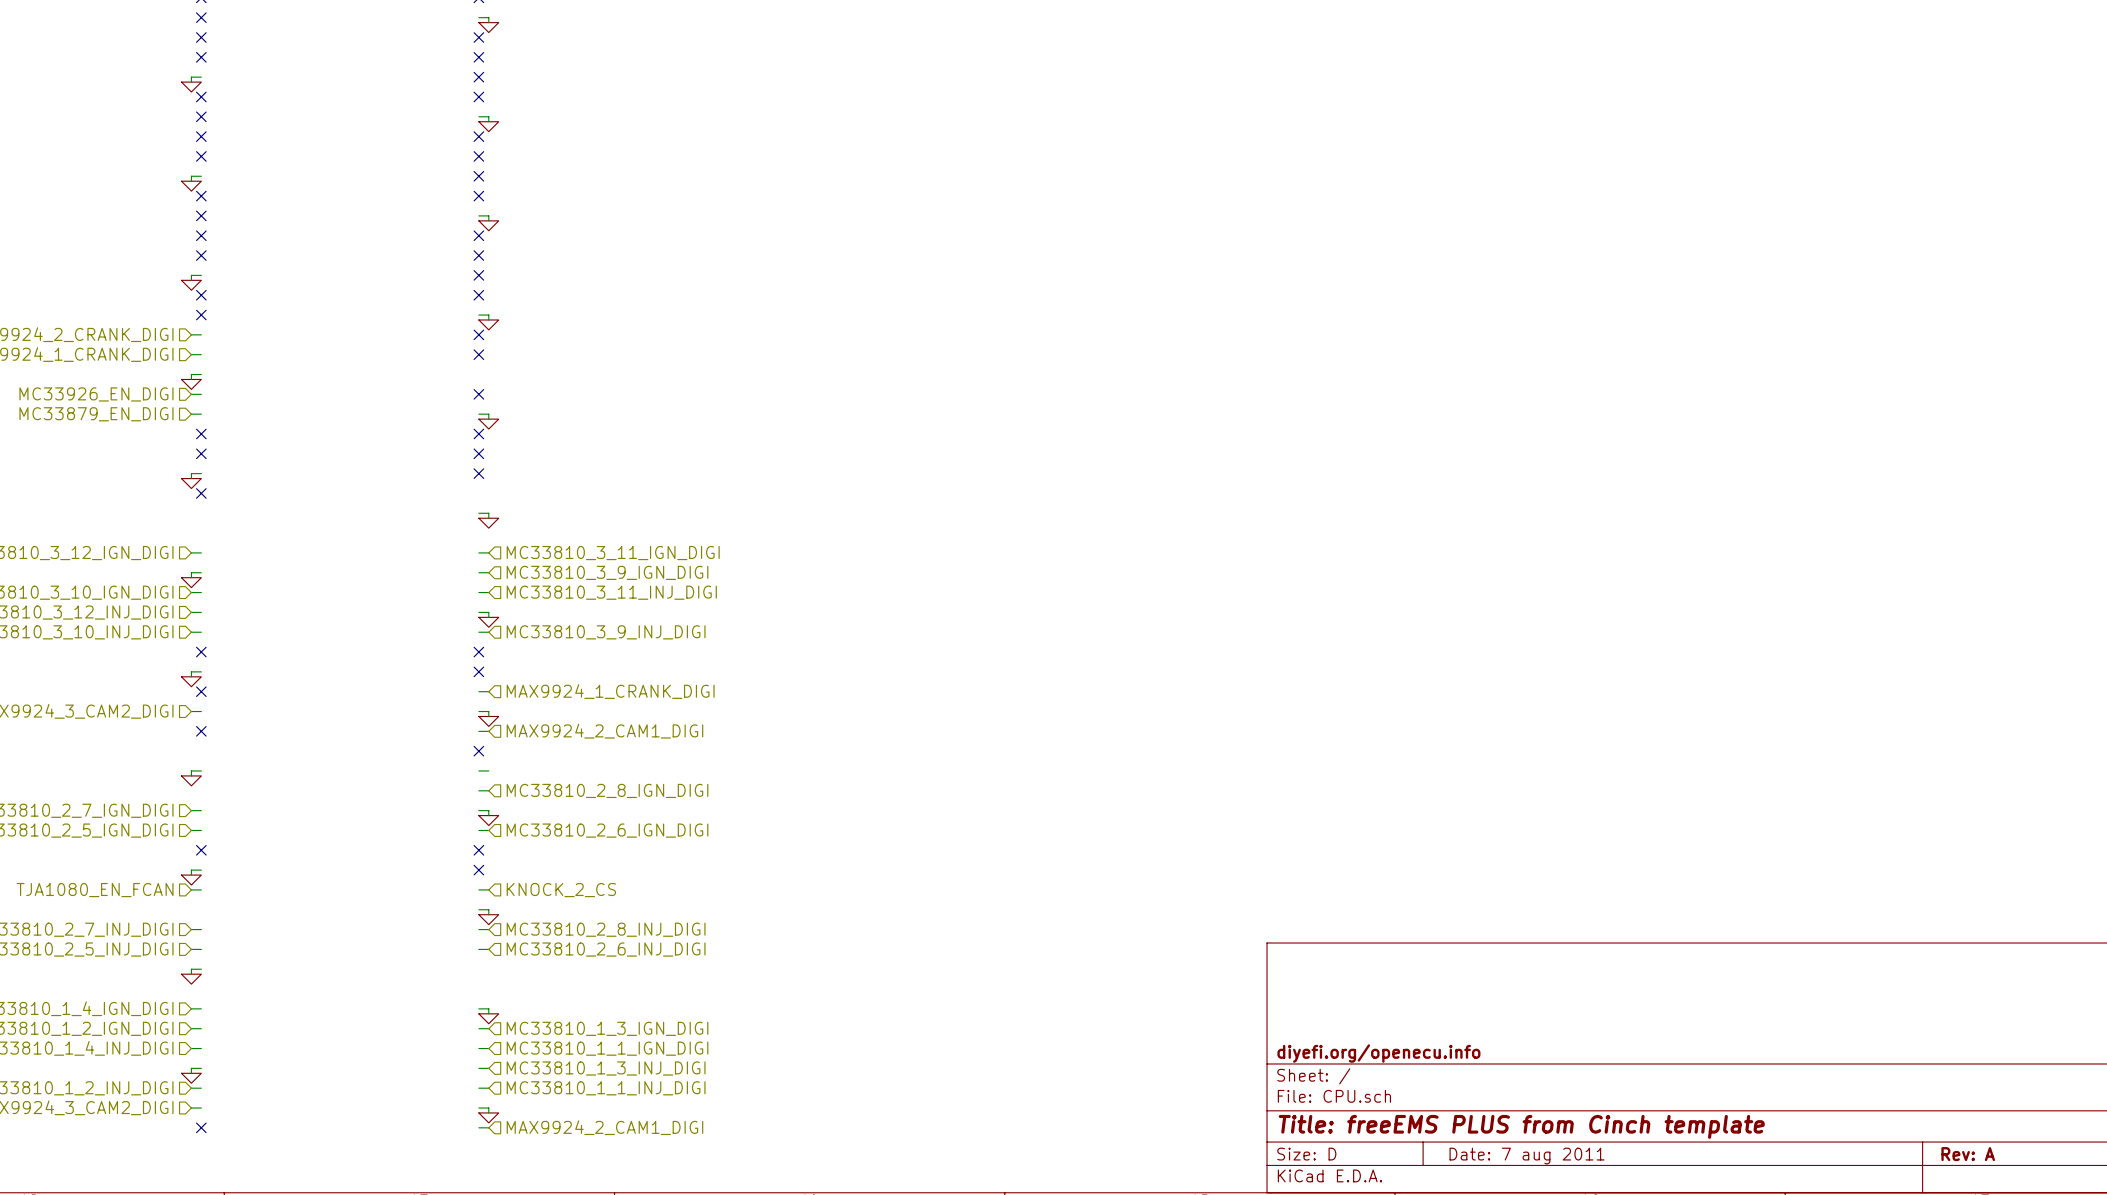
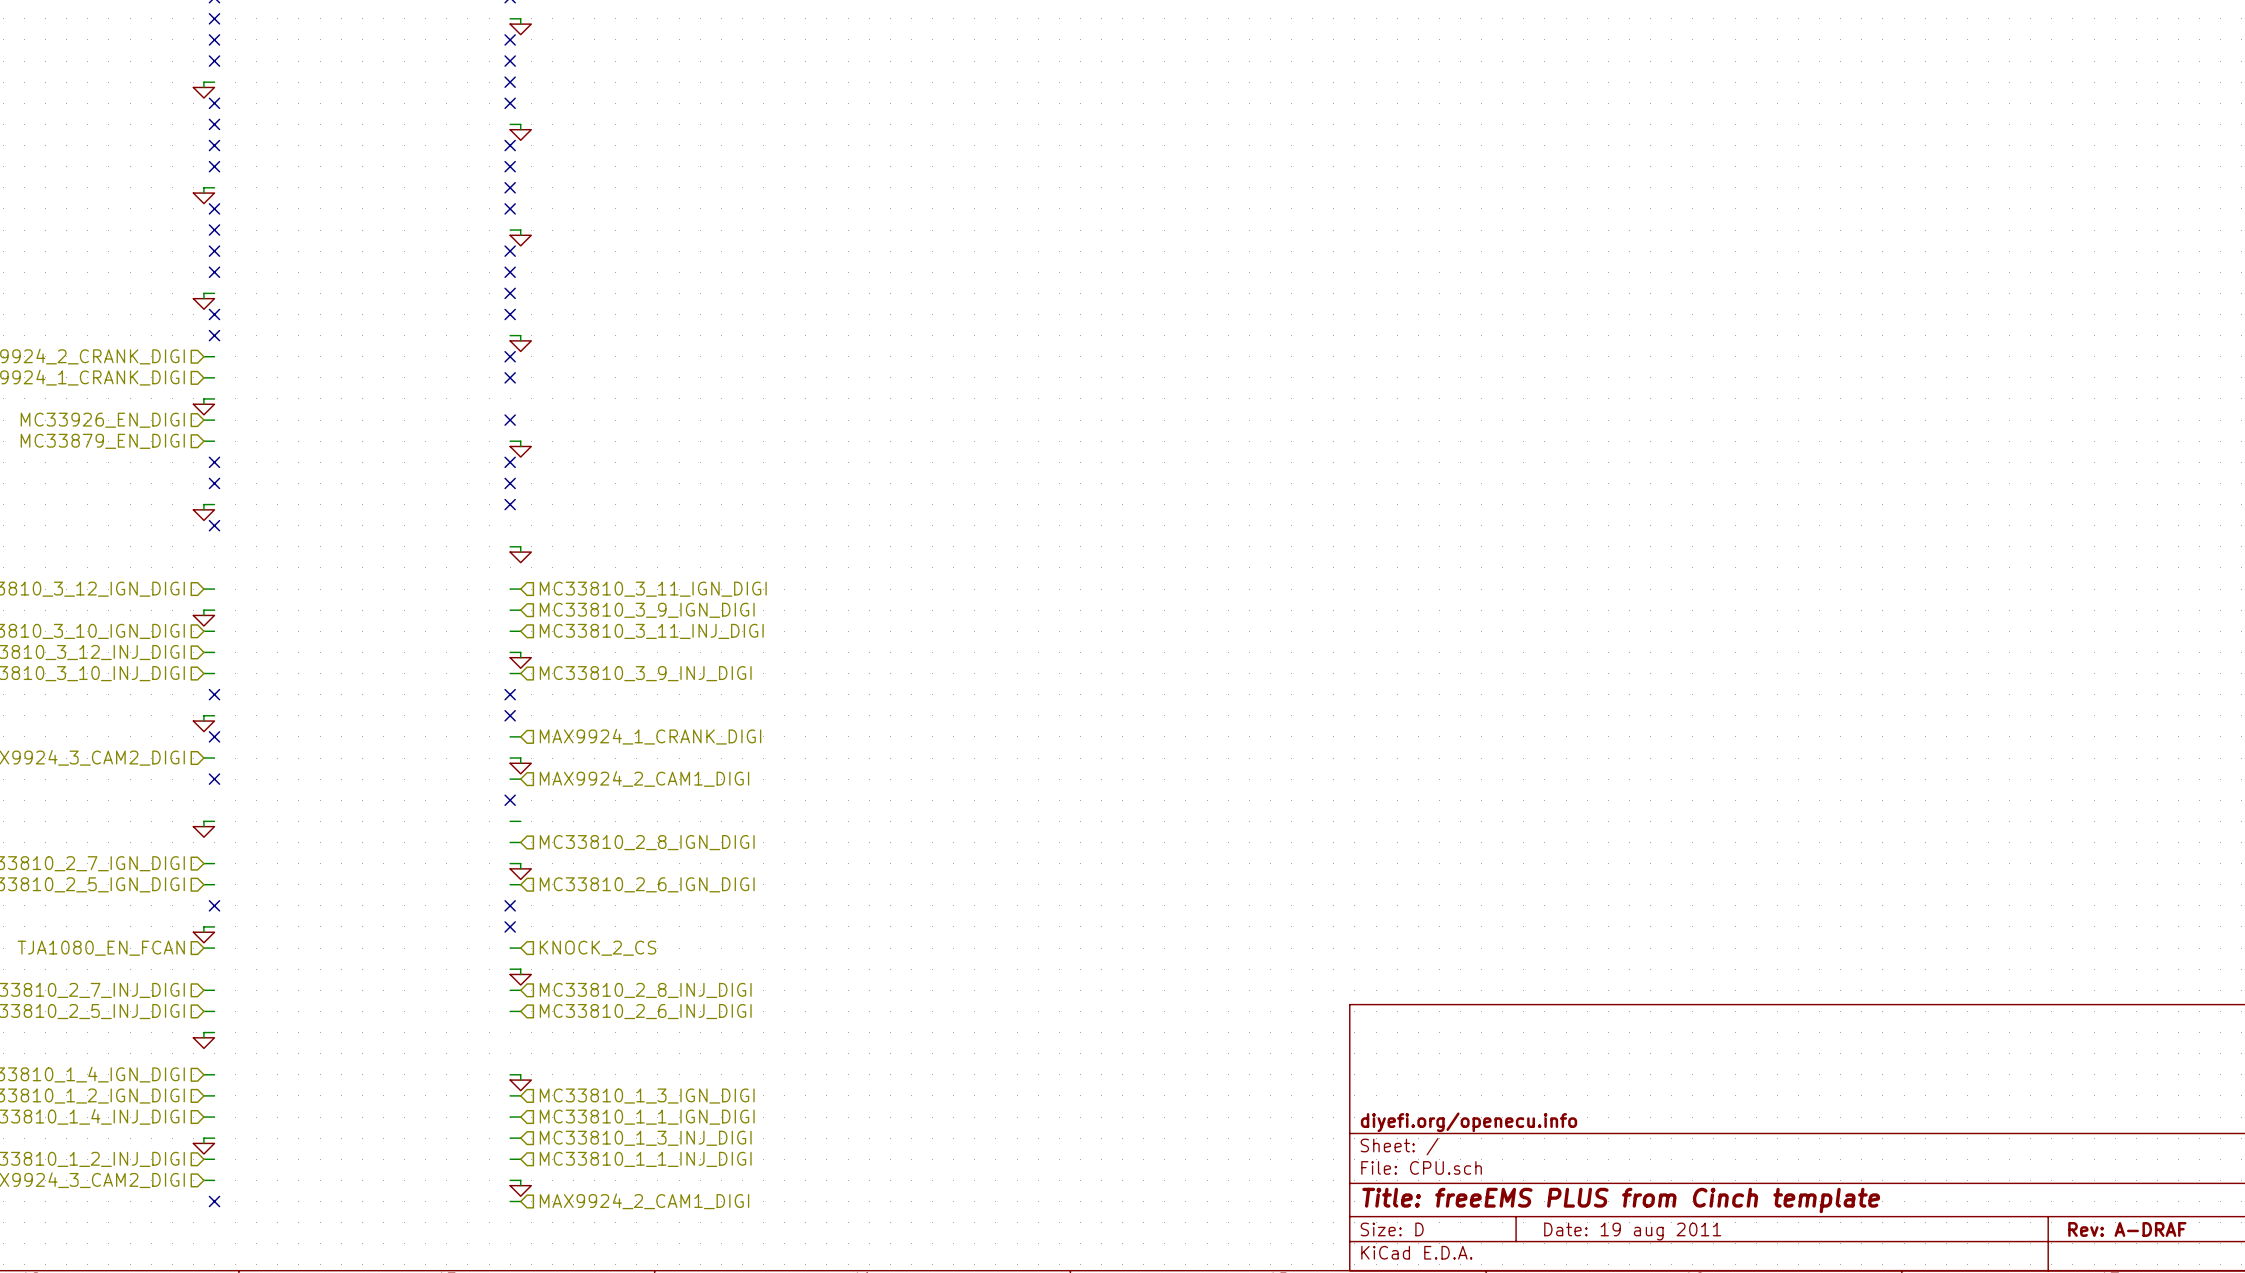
title block: Rev: A (1968, 1154) -> Rev: A-DRAF (2127, 1229)
title block: Date: 7 aug 2011 (1527, 1156) -> Date: 19 aug 2011 (1632, 1231)

